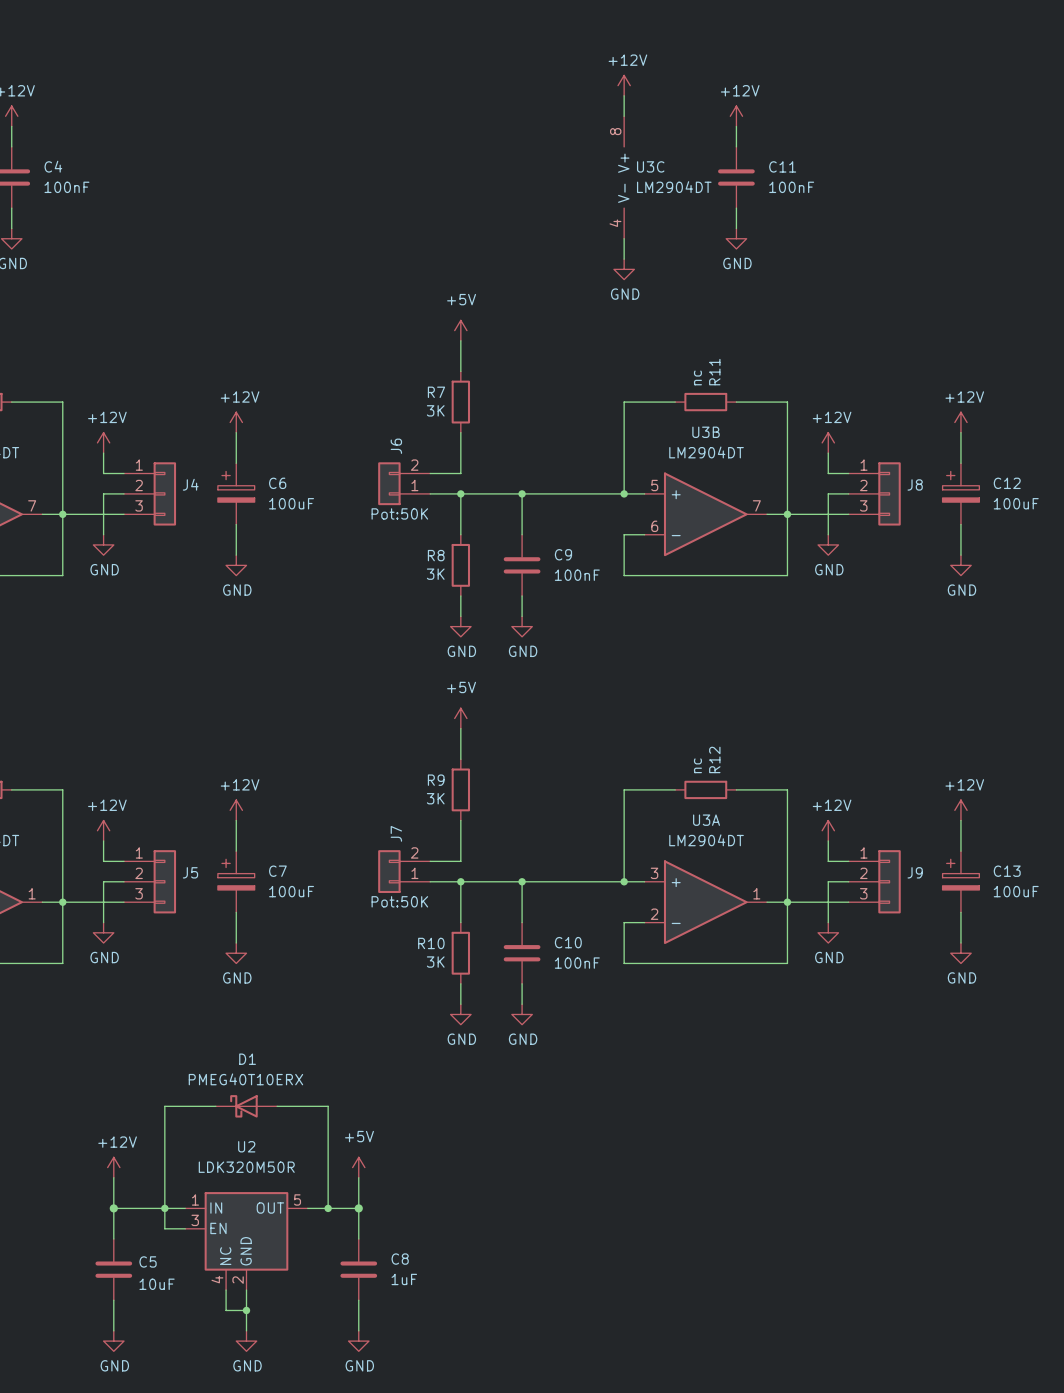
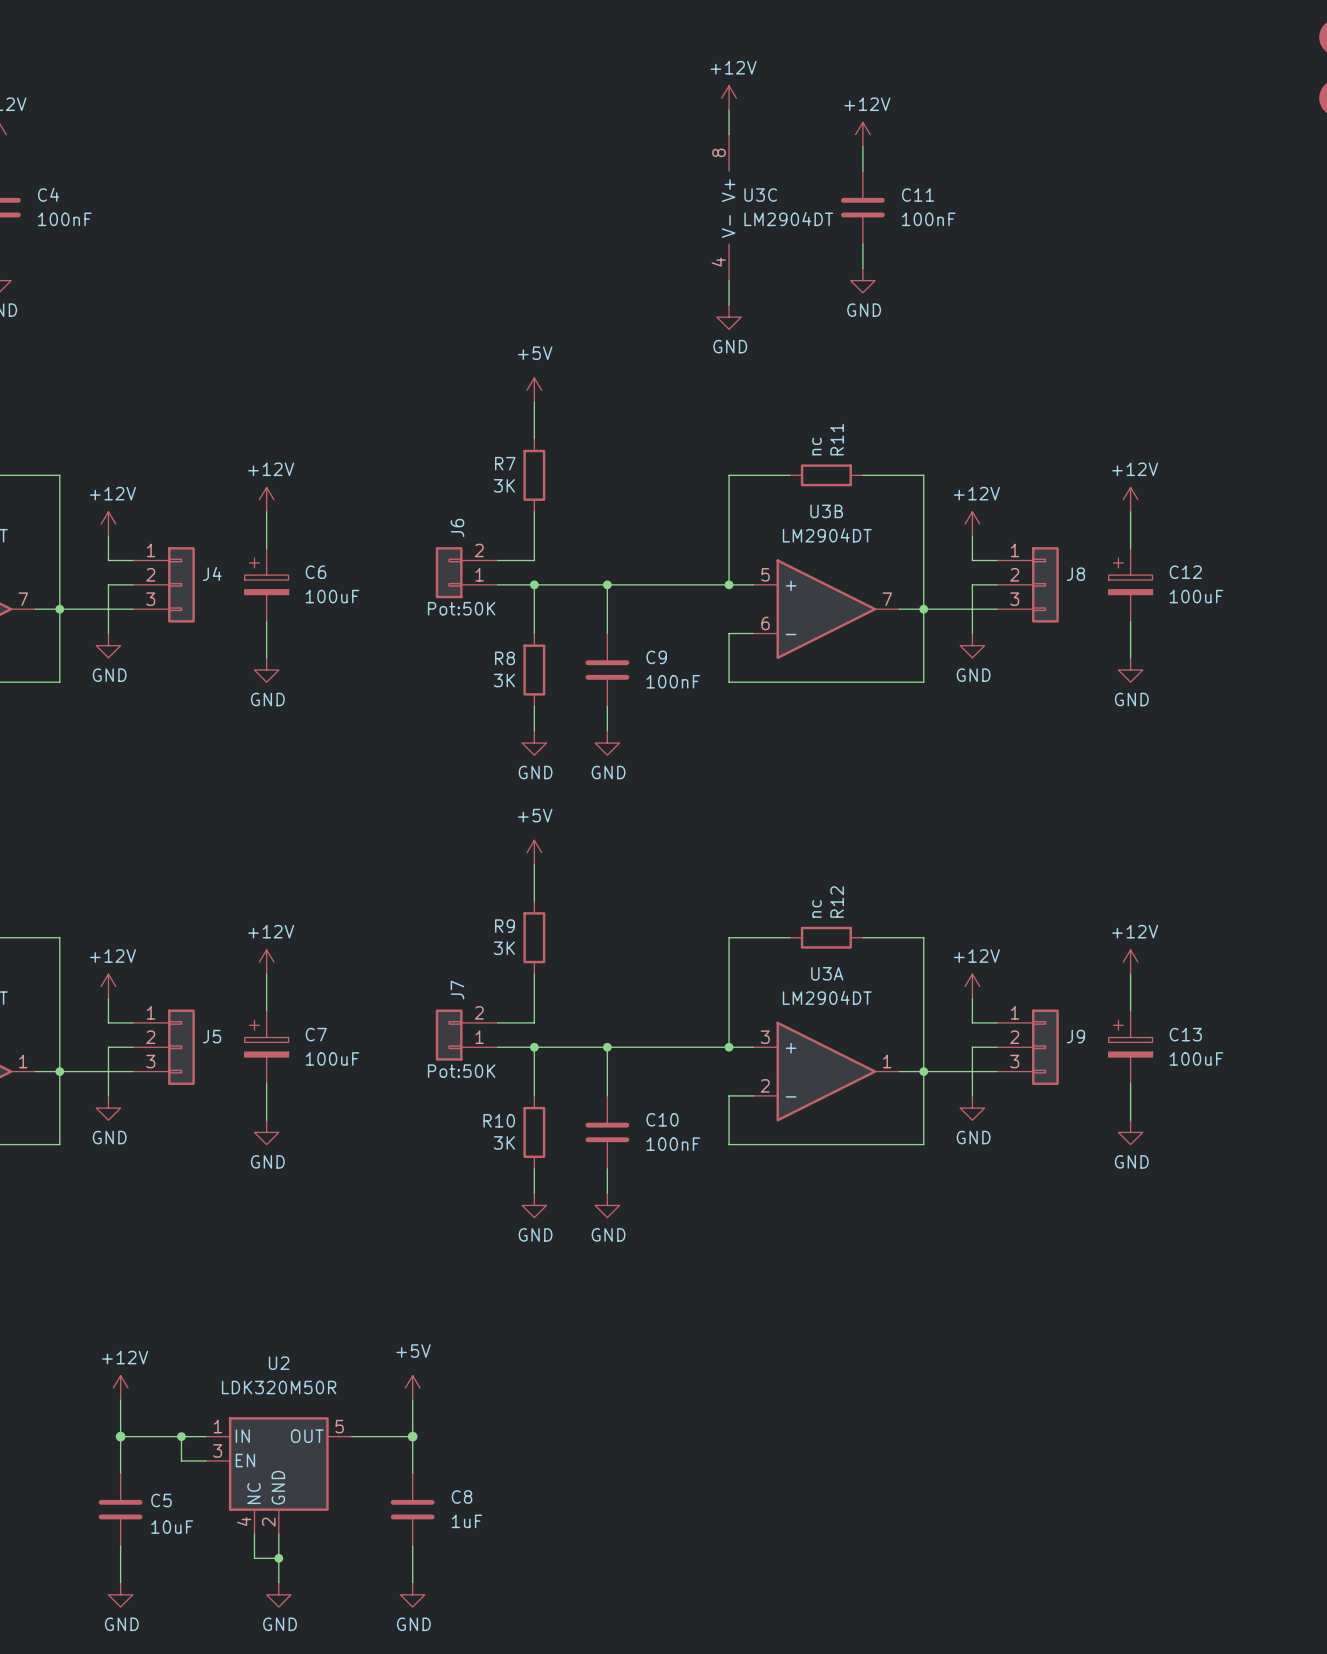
wire: (215, 1106) (164, 1106) (164, 1208) -> none
D1: PMEG40T10ERX (246, 1106) -> none
wire: (277, 1106) (328, 1106) (328, 1208) -> none
junction: (328, 1208) -> none

